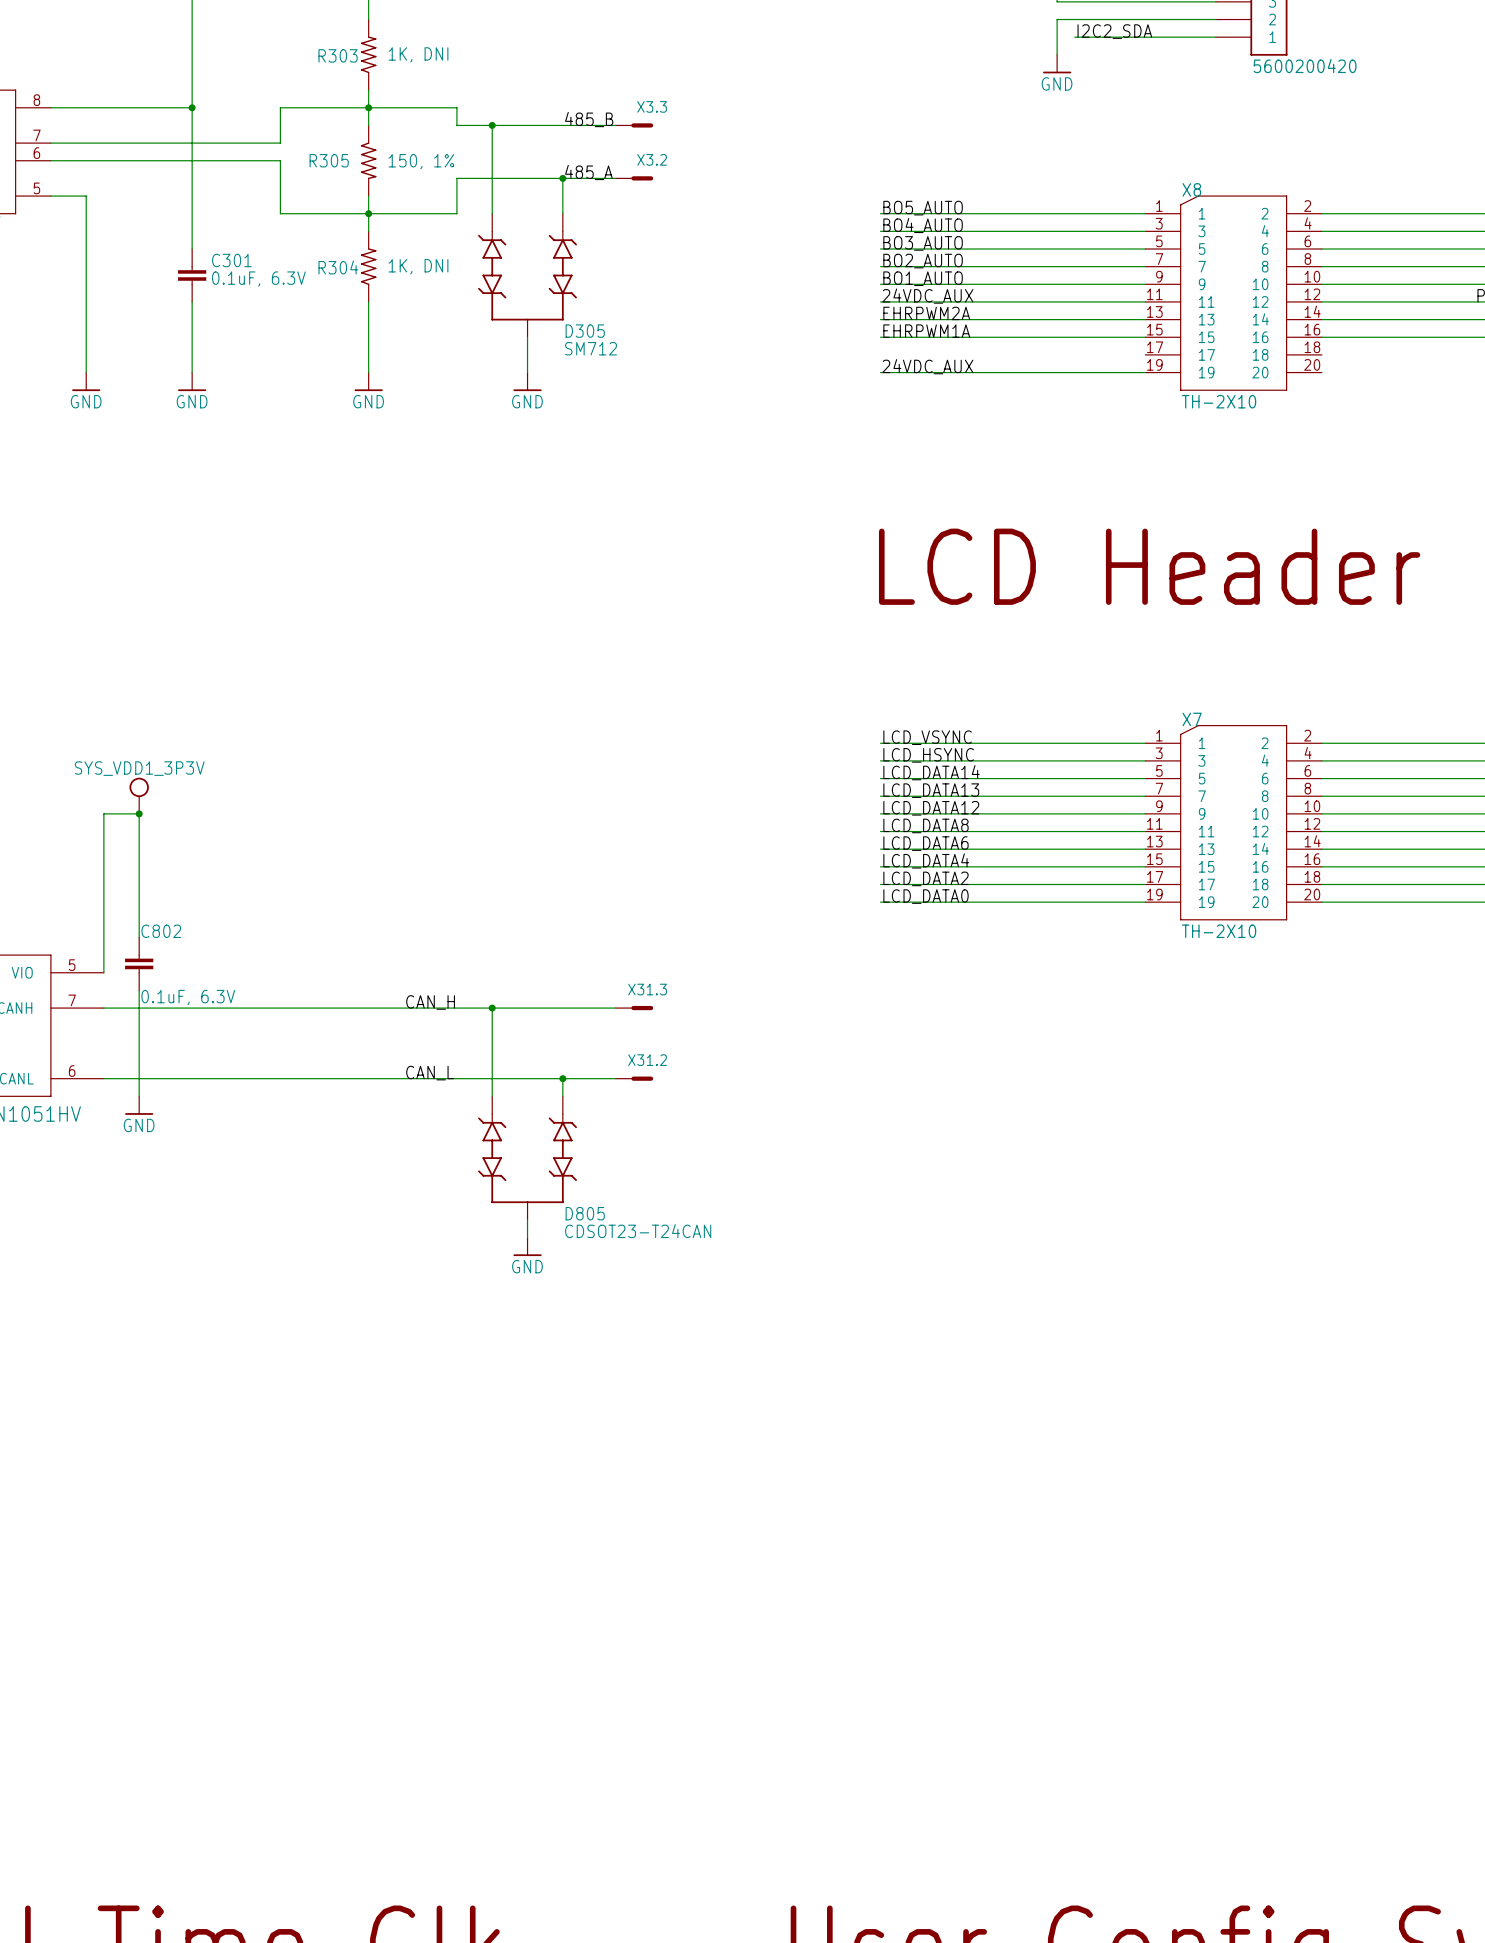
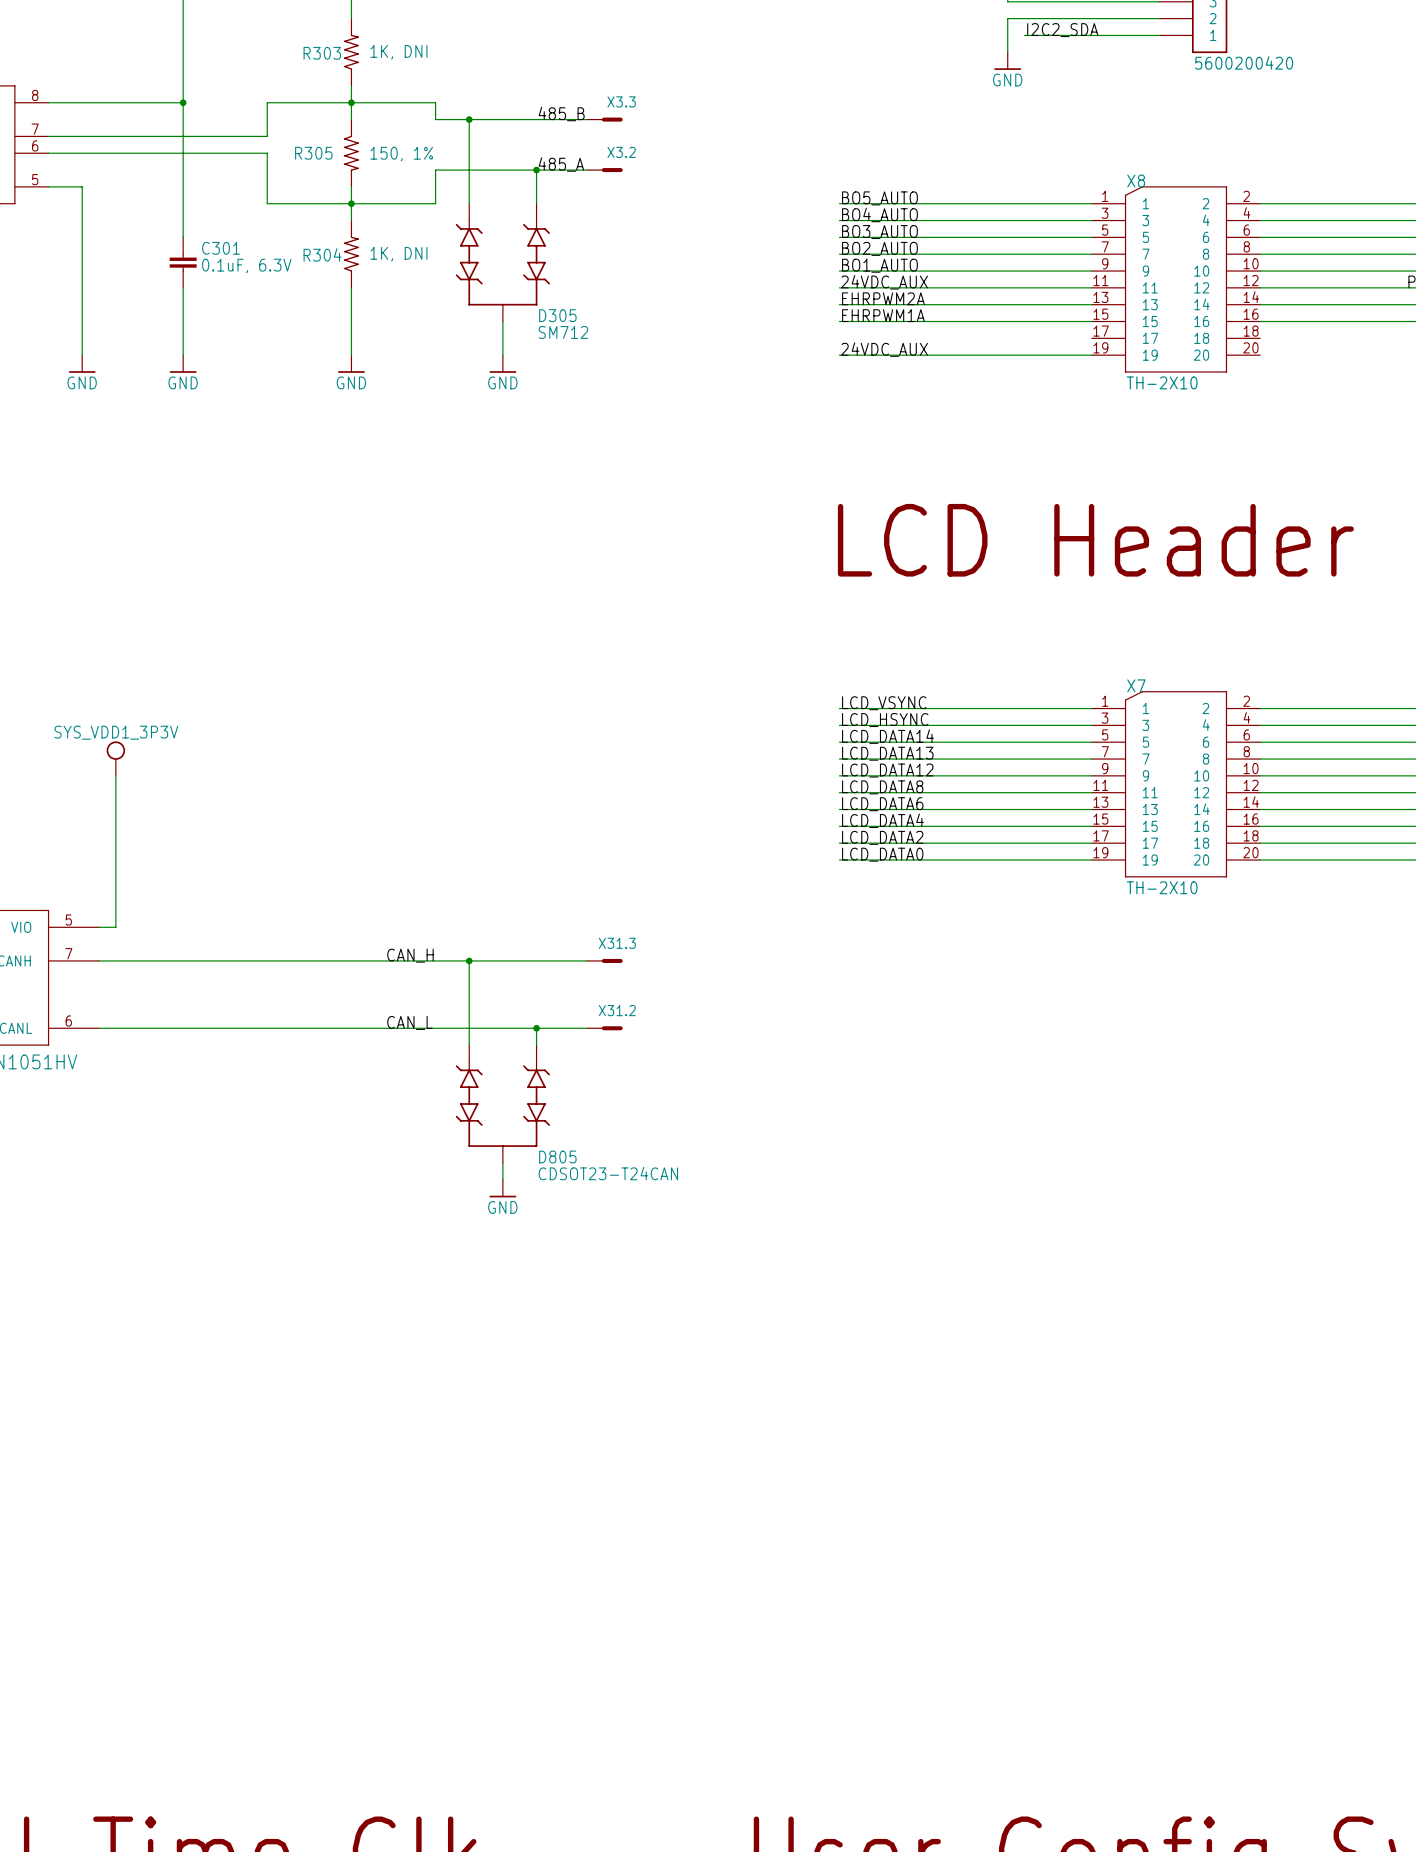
power symbol position: SYS_VDD1_3P3V (139, 795) -> SYS_VDD1_3P3V (115, 758)
junction: (139, 813) -> none
wire: (139, 937) (139, 813) (103, 813) (103, 972) -> (115, 775) (115, 927) (99, 927)
C802: 0.1uF, 6.3V (139, 963) -> none
wire: (139, 990) (139, 1096) -> none
power symbol: GND (139, 1105) -> none

